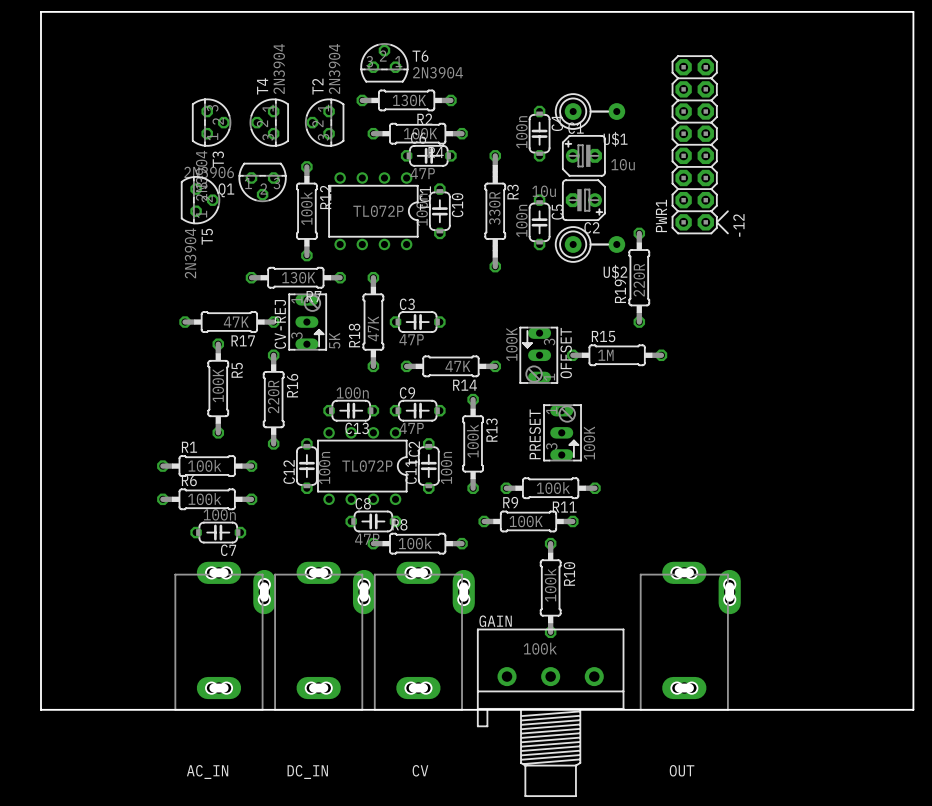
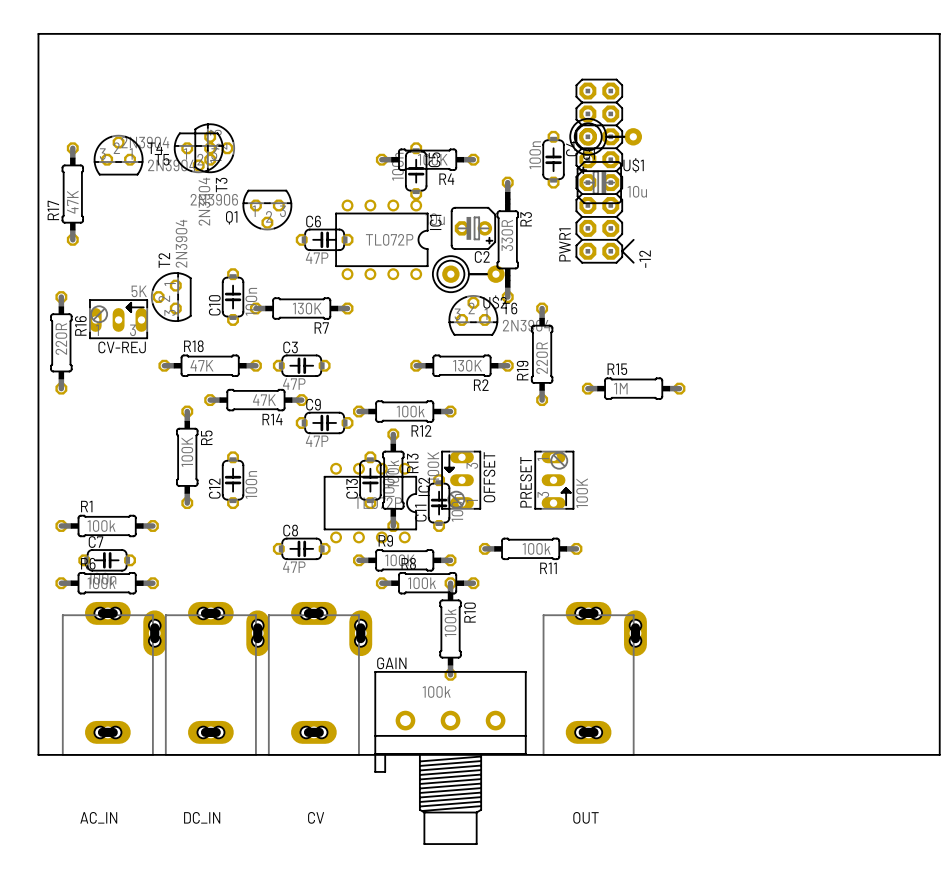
T6 position: (384, 62) -> (473, 315)
R2 position: (406, 100) -> (461, 365)
T4 rotation: 0° (269, 122) -> 90° clockwise (118, 155)
T4 position: (269, 122) -> (118, 155)
T2 position: (324, 122) -> (171, 297)
PWR1 position: (700, 144) -> (604, 171)
C6 position: (428, 155) -> (324, 239)
T5 rotation: 0° (200, 200) -> 90° clockwise (198, 152)
T5 position: (200, 200) -> (198, 152)
C2 position: (583, 200) -> (473, 228)
R12 rotation: 0° (306, 211) -> 90° clockwise (404, 411)
R12 position: (306, 211) -> (404, 411)
C10 rotation: 0° (439, 211) -> 180° (233, 297)
C10 position: (439, 211) -> (233, 297)
C5 position: (539, 222) -> (416, 171)
U$2 position: (590, 244) -> (468, 274)
R19 position: (639, 277) -> (542, 354)
CV-REJ: none -> 5K (118, 319)
R17 rotation: 0° (229, 322) -> 90° clockwise (72, 194)
R17 position: (229, 322) -> (72, 194)
CV-REJ: 5K (307, 322) -> none
R18 rotation: 0° (373, 322) -> 90° clockwise (210, 365)
R18 position: (373, 322) -> (210, 365)
C3 position: (417, 322) -> (301, 365)
OFFSET position: (538, 355) -> (461, 480)
R14 position: (450, 366) -> (255, 400)
R5 position: (218, 388) -> (187, 457)
R16 position: (273, 399) -> (61, 342)
C13 rotation: 0° (351, 410) -> 90° clockwise (370, 480)
C13 position: (351, 410) -> (370, 480)
C9 position: (417, 410) -> (324, 422)
PRESET position: (562, 432) -> (554, 480)
R13 position: (473, 443) -> (393, 480)
R1 position: (207, 466) -> (107, 525)
C12 position: (306, 466) -> (233, 480)
R11 position: (550, 488) -> (530, 548)
R6 position: (207, 499) -> (107, 583)
C8 position: (373, 521) -> (301, 548)
R9 position: (528, 521) -> (404, 560)
C7 rotation: 0° (218, 532) -> 180° (107, 560)
C7 position: (218, 532) -> (107, 560)
R10 position: (550, 587) -> (450, 629)
AC_IN position: (225, 636) -> (114, 678)
DC_IN position: (324, 636) -> (217, 678)
CV position: (424, 636) -> (320, 678)
OUT position: (690, 636) -> (594, 678)
GAIN position: (550, 712) -> (450, 757)

